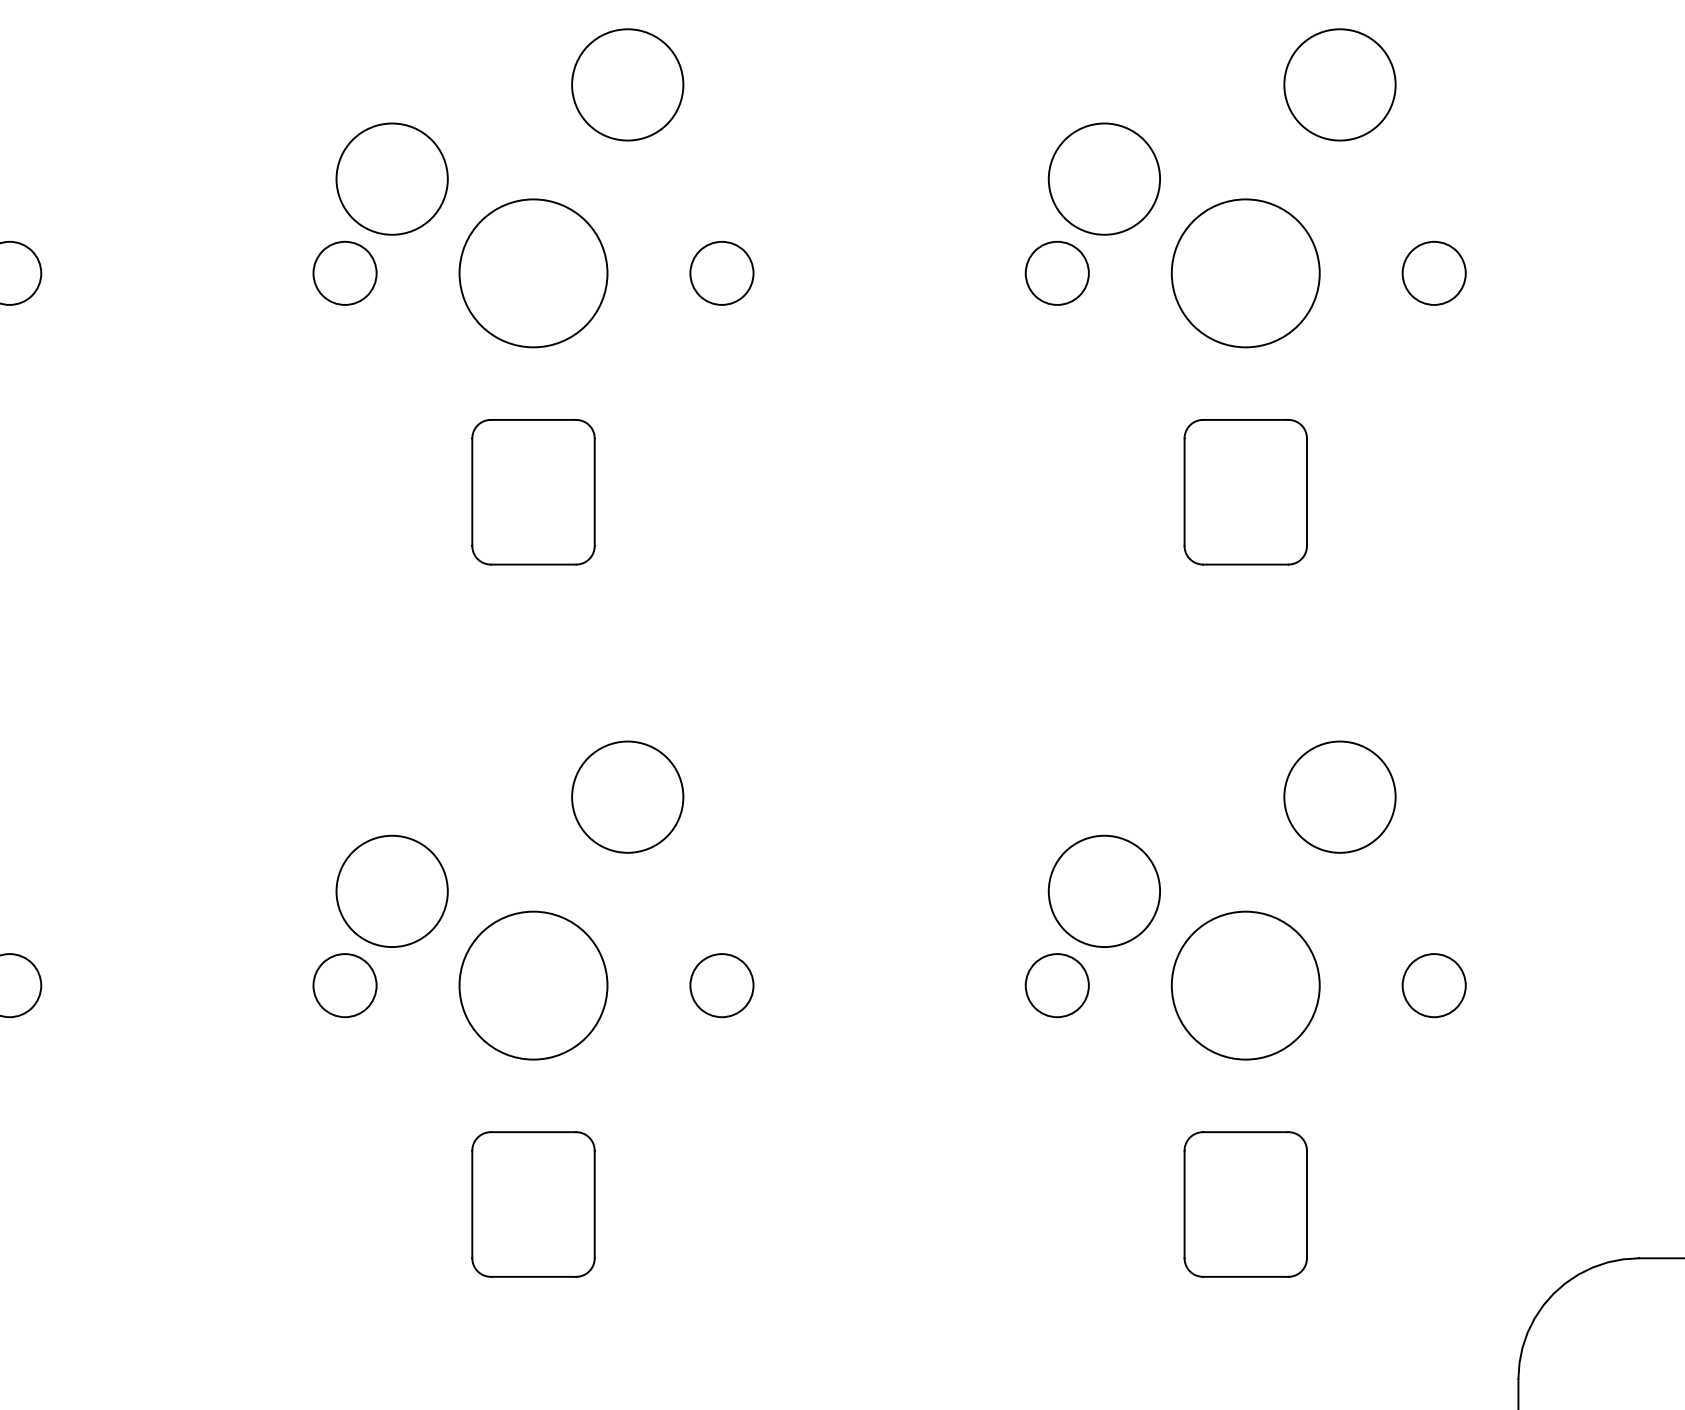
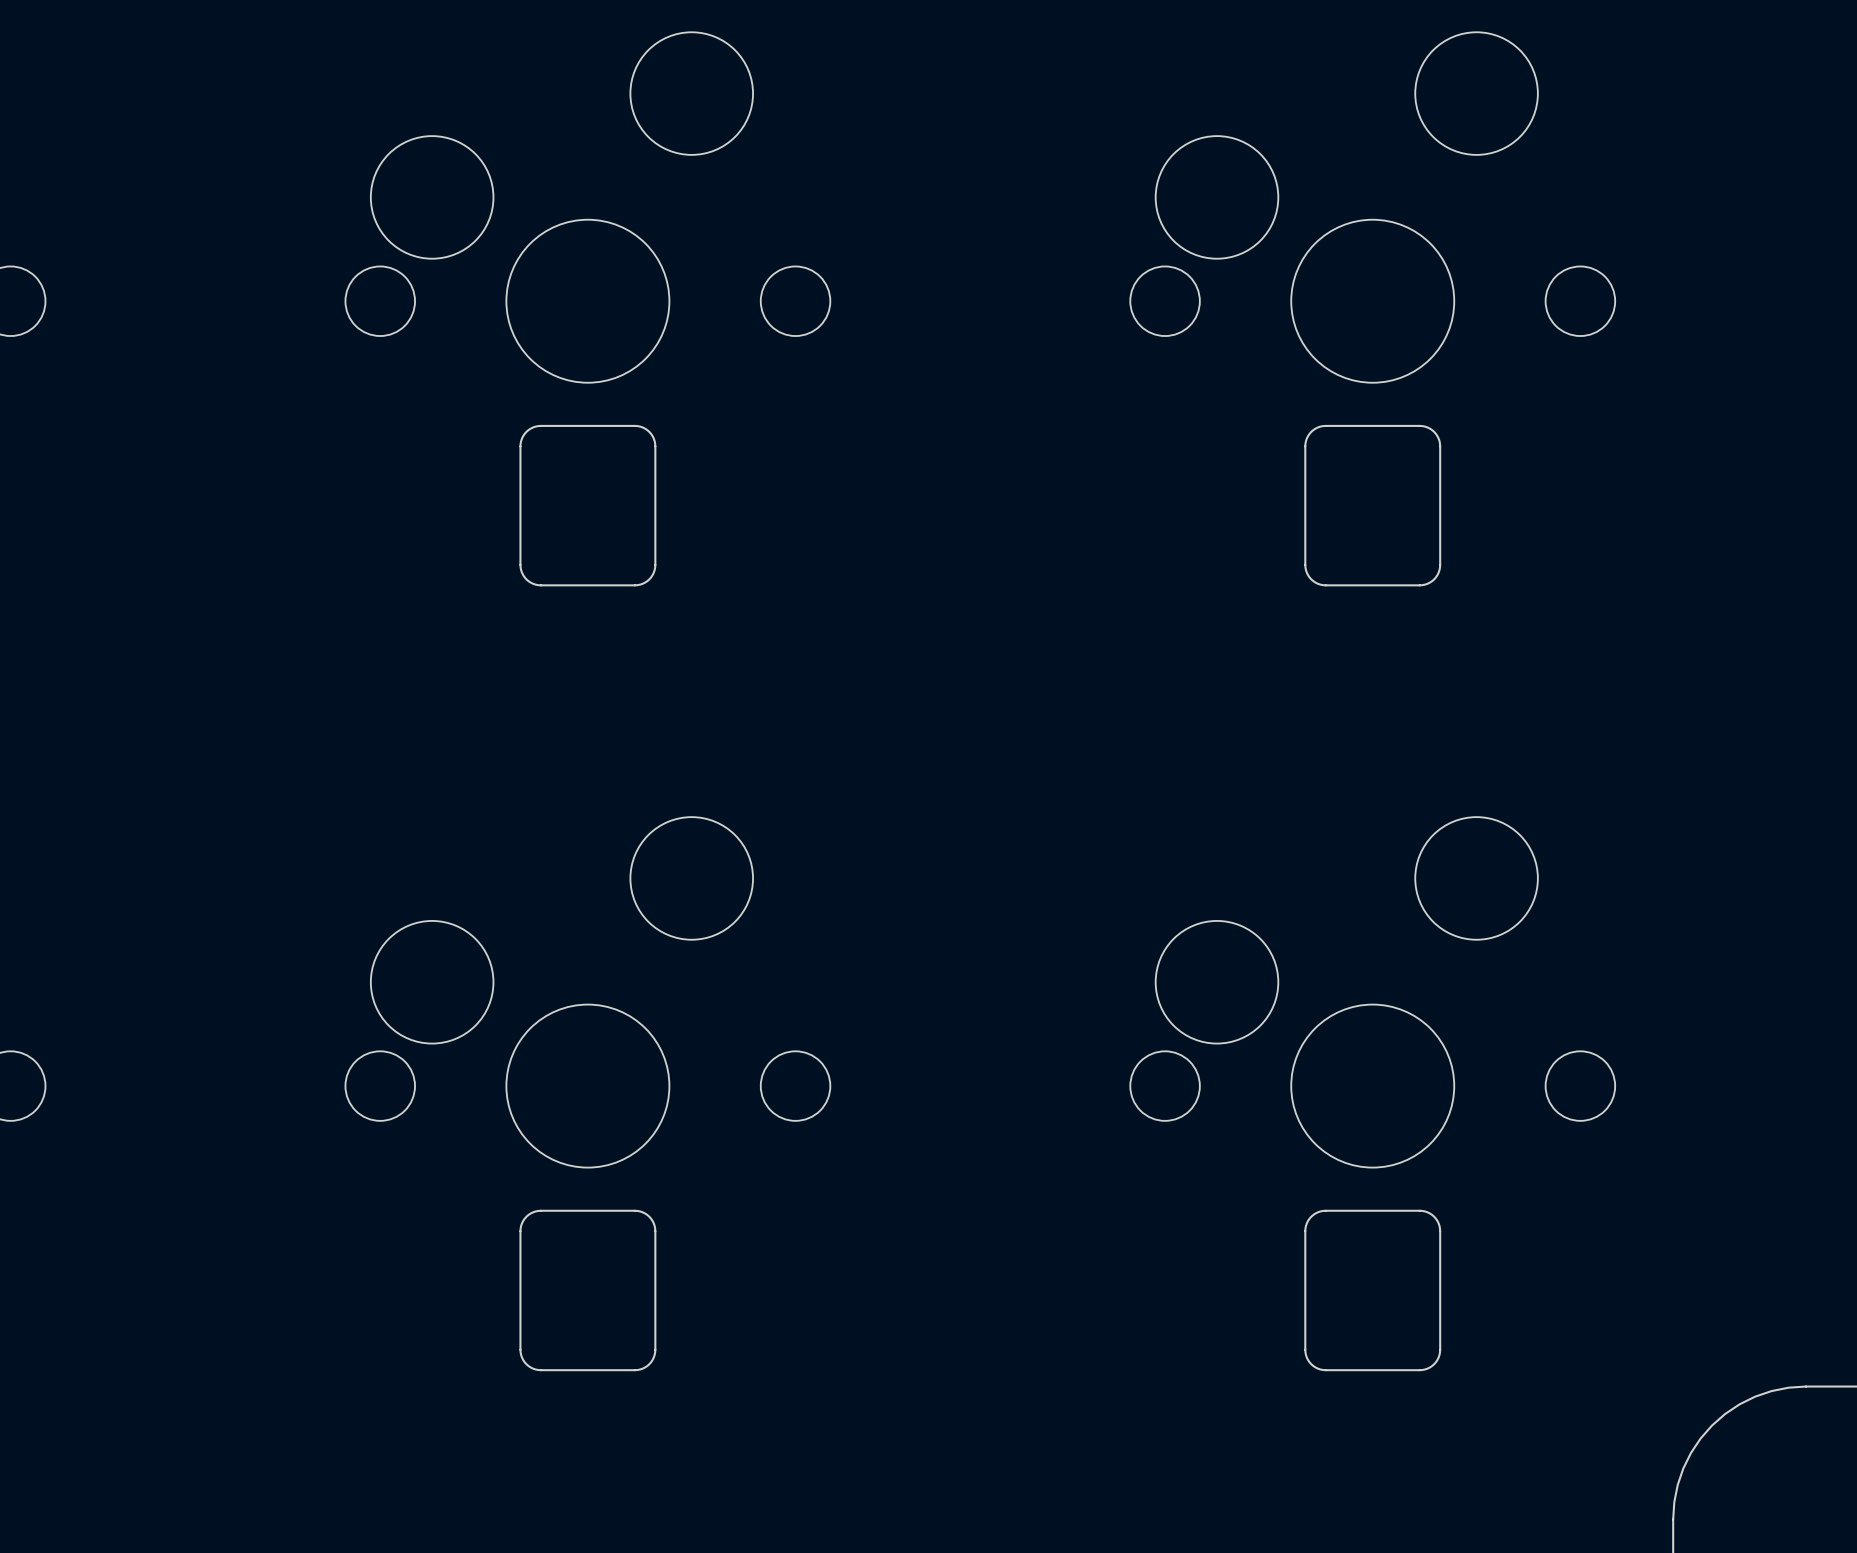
part position: (533, 492) -> (587, 505)
part position: (1245, 492) -> (1372, 505)
part position: (533, 1204) -> (587, 1290)
part position: (1245, 1204) -> (1372, 1290)

